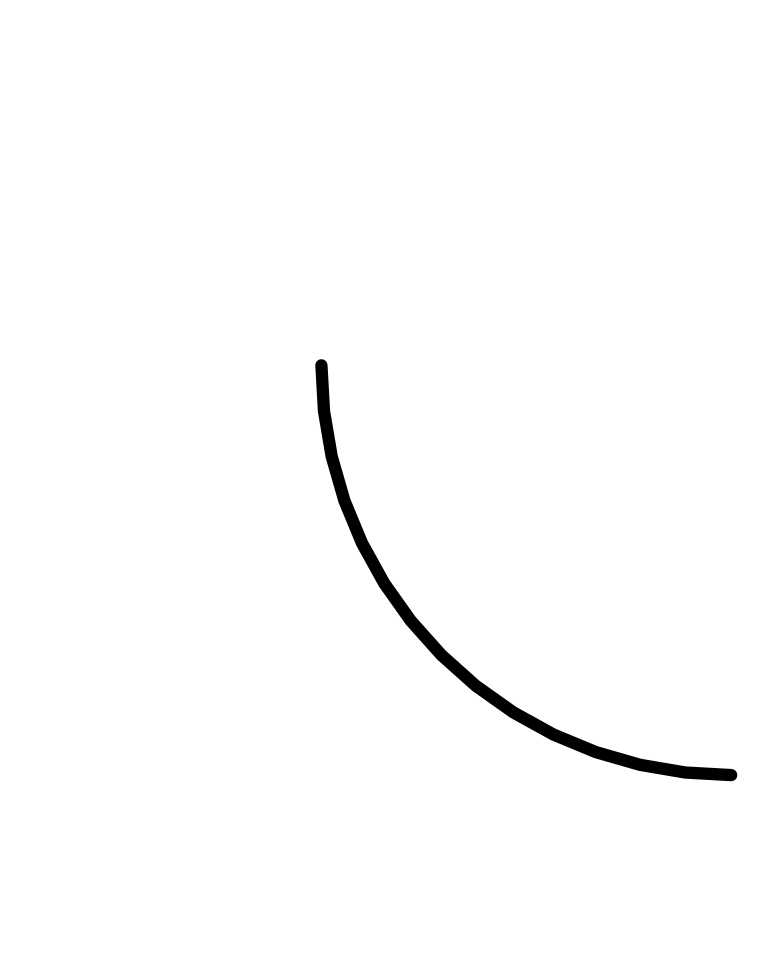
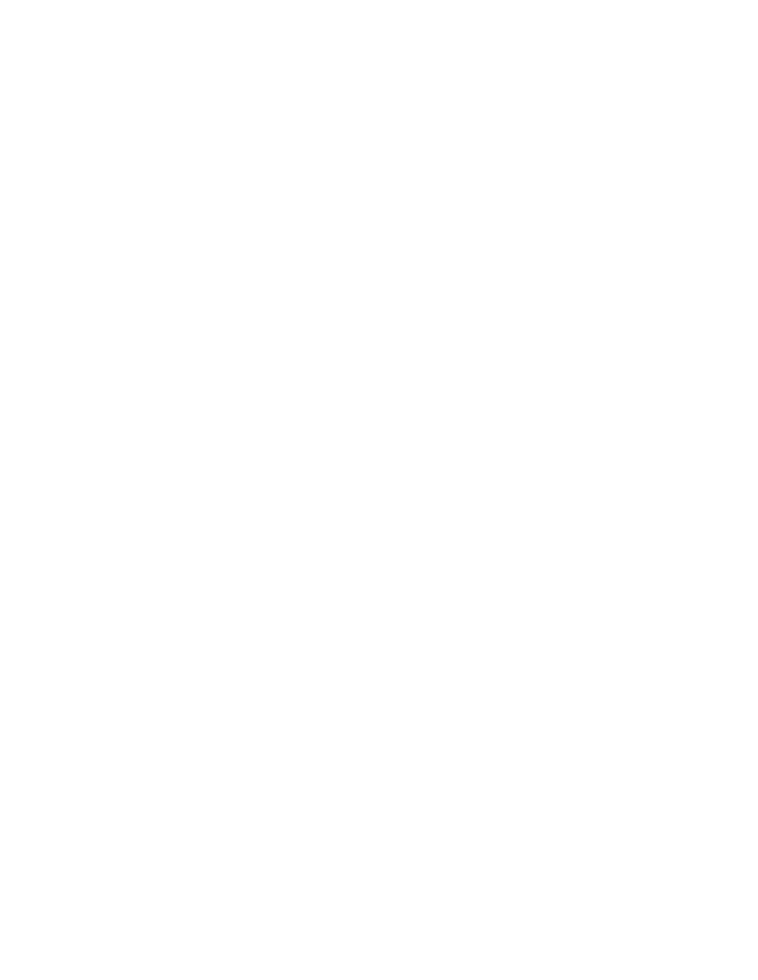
board edge: (321, 365) (323, 411) (331, 456) (344, 500) (362, 543) (384, 583) (410, 620) (441, 655) (475, 685) (513, 712) (553, 734) (595, 752) (640, 764) (685, 772) (731, 775) -> none

